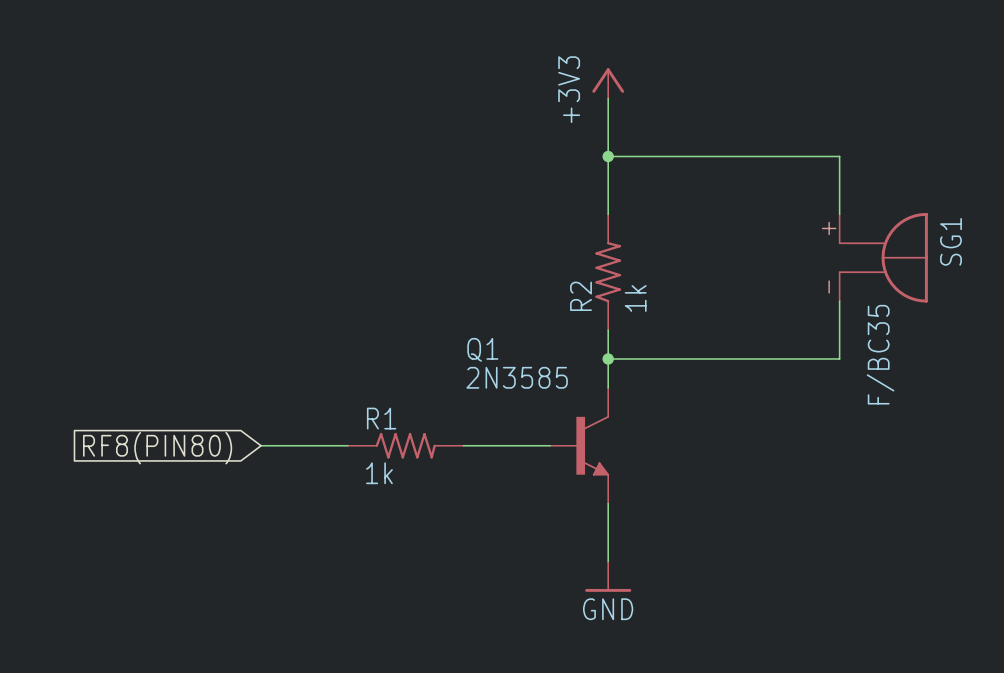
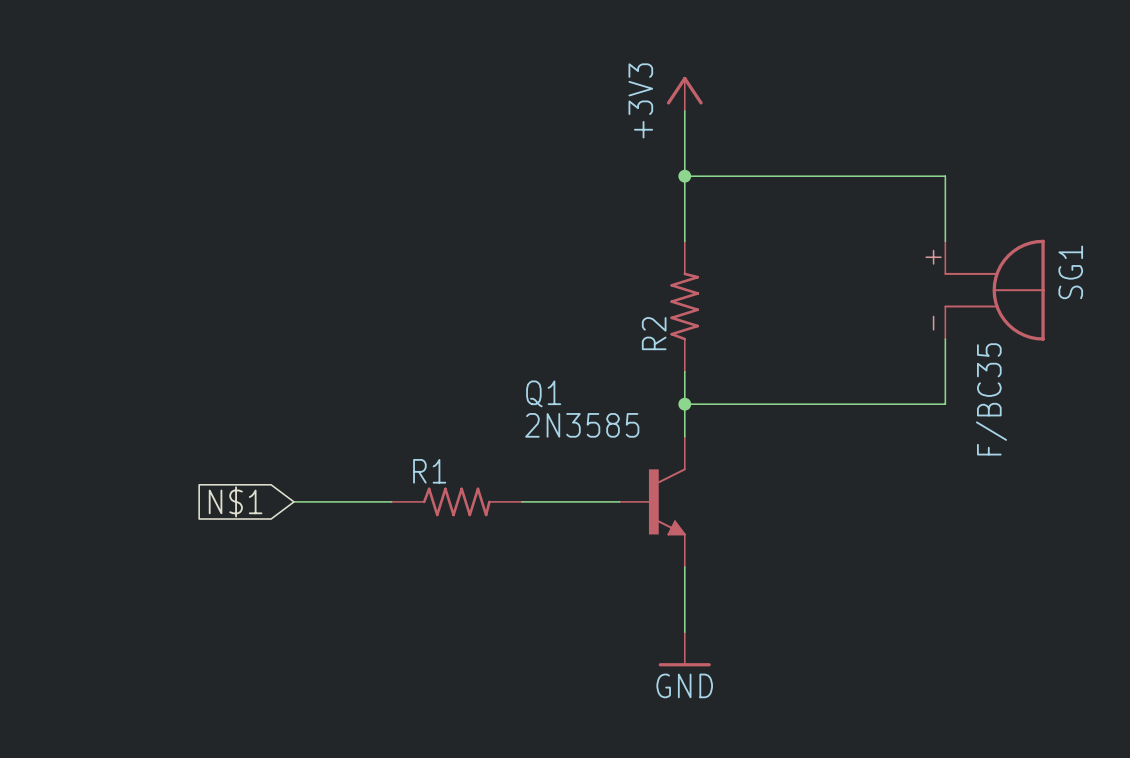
R2 value: 1k (635, 298) -> none
global label: RF8(PIN80) (157, 448) -> N$1 (235, 501)
R1 value: 1k (379, 473) -> none

